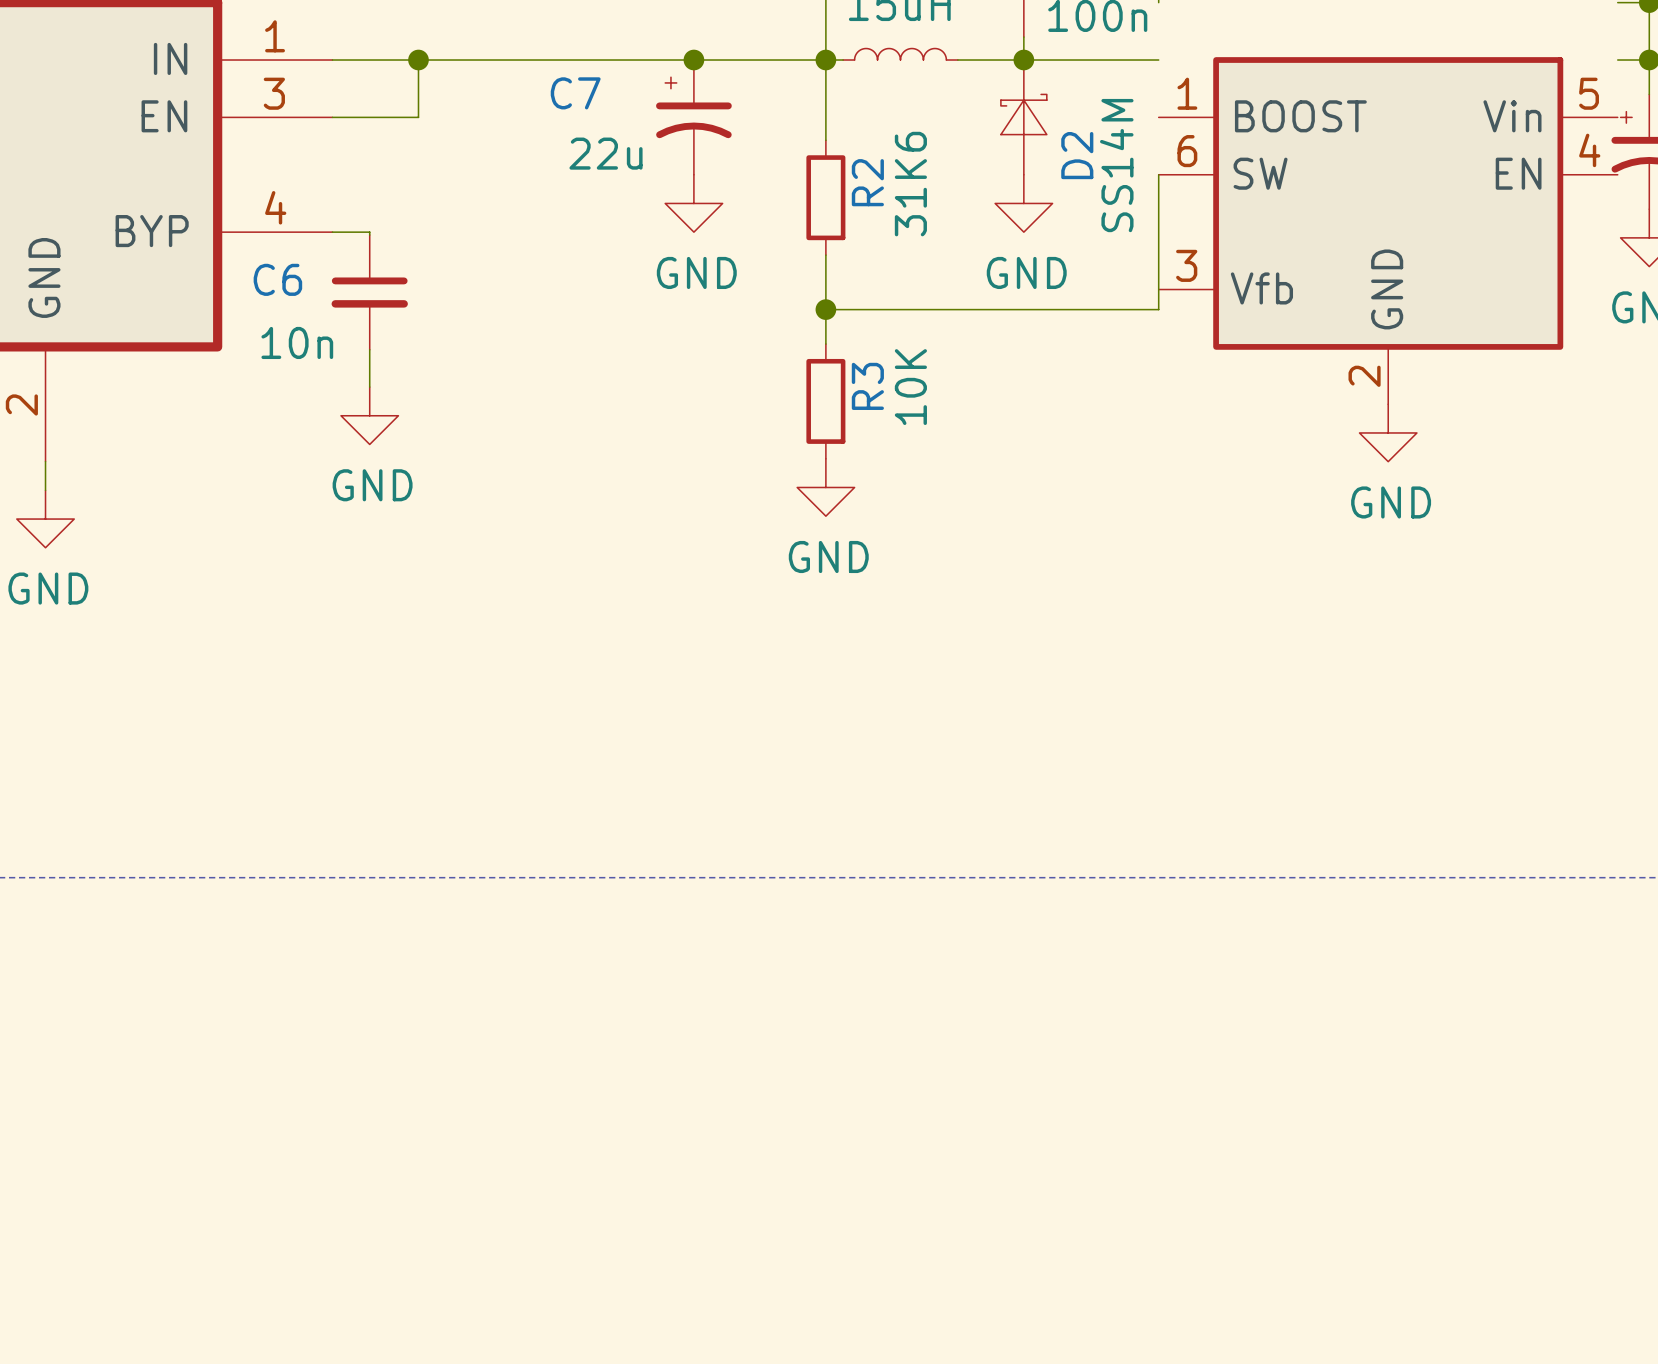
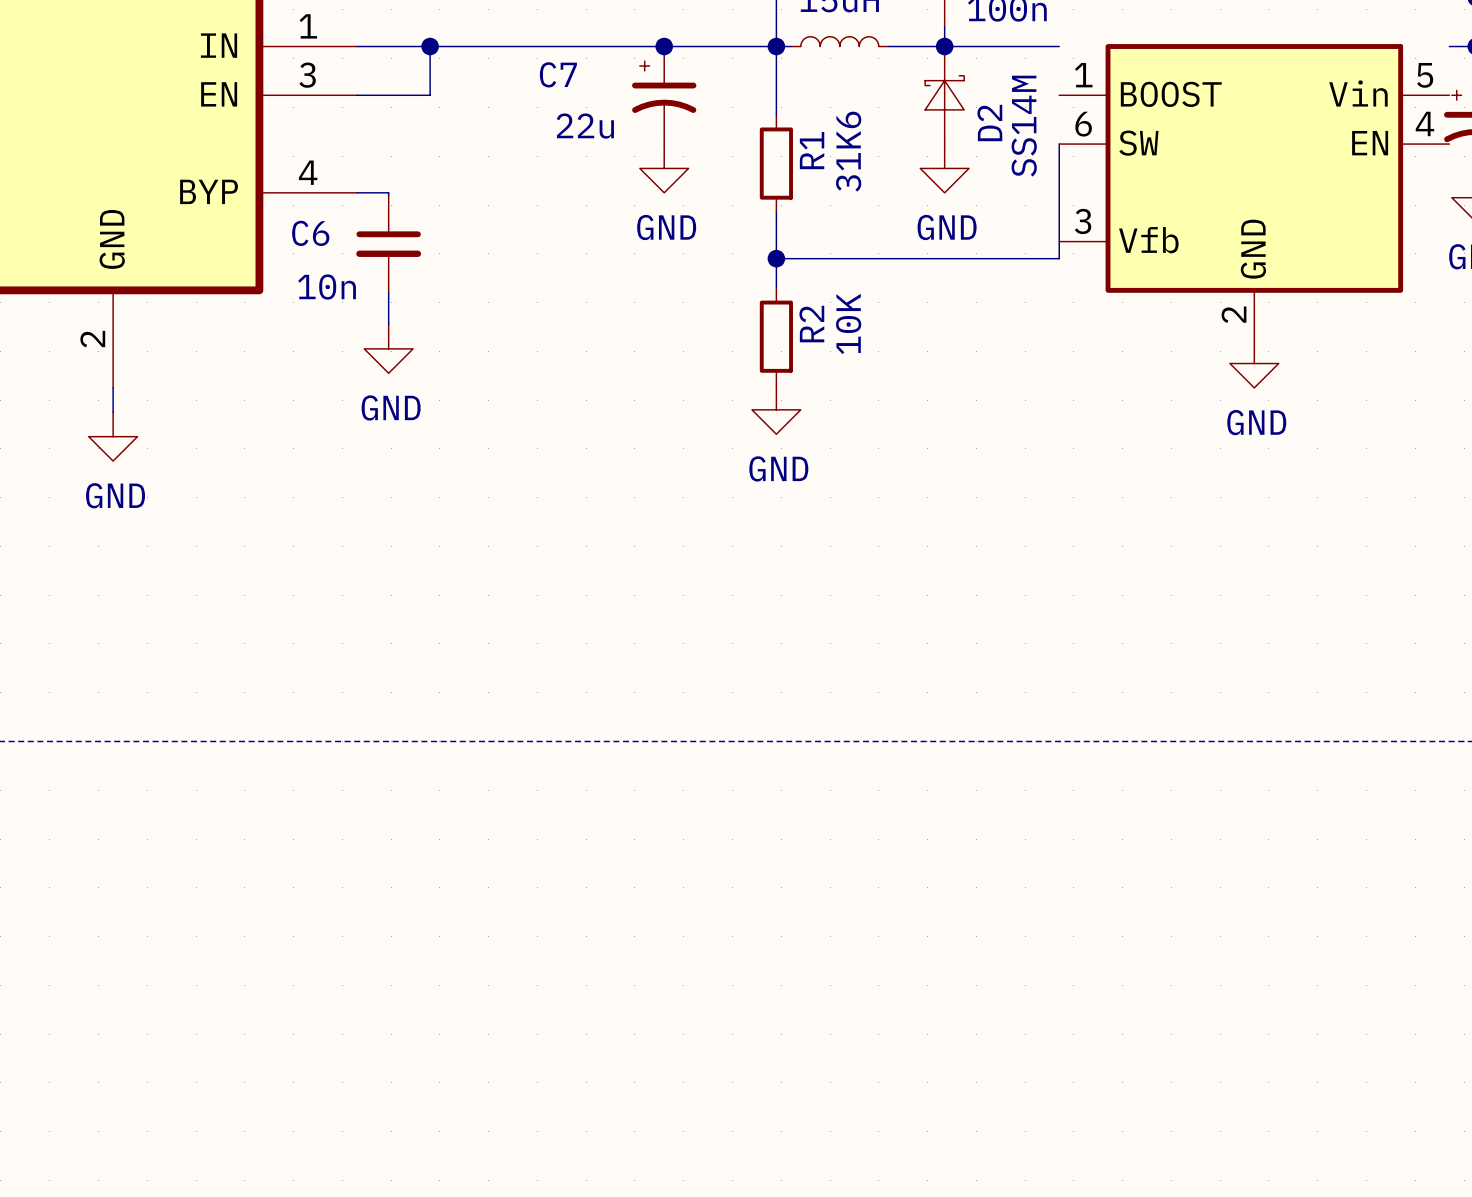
R2 name: R2 (867, 182) -> R1 (812, 150)
R3 name: R3 (867, 386) -> R2 (811, 324)

